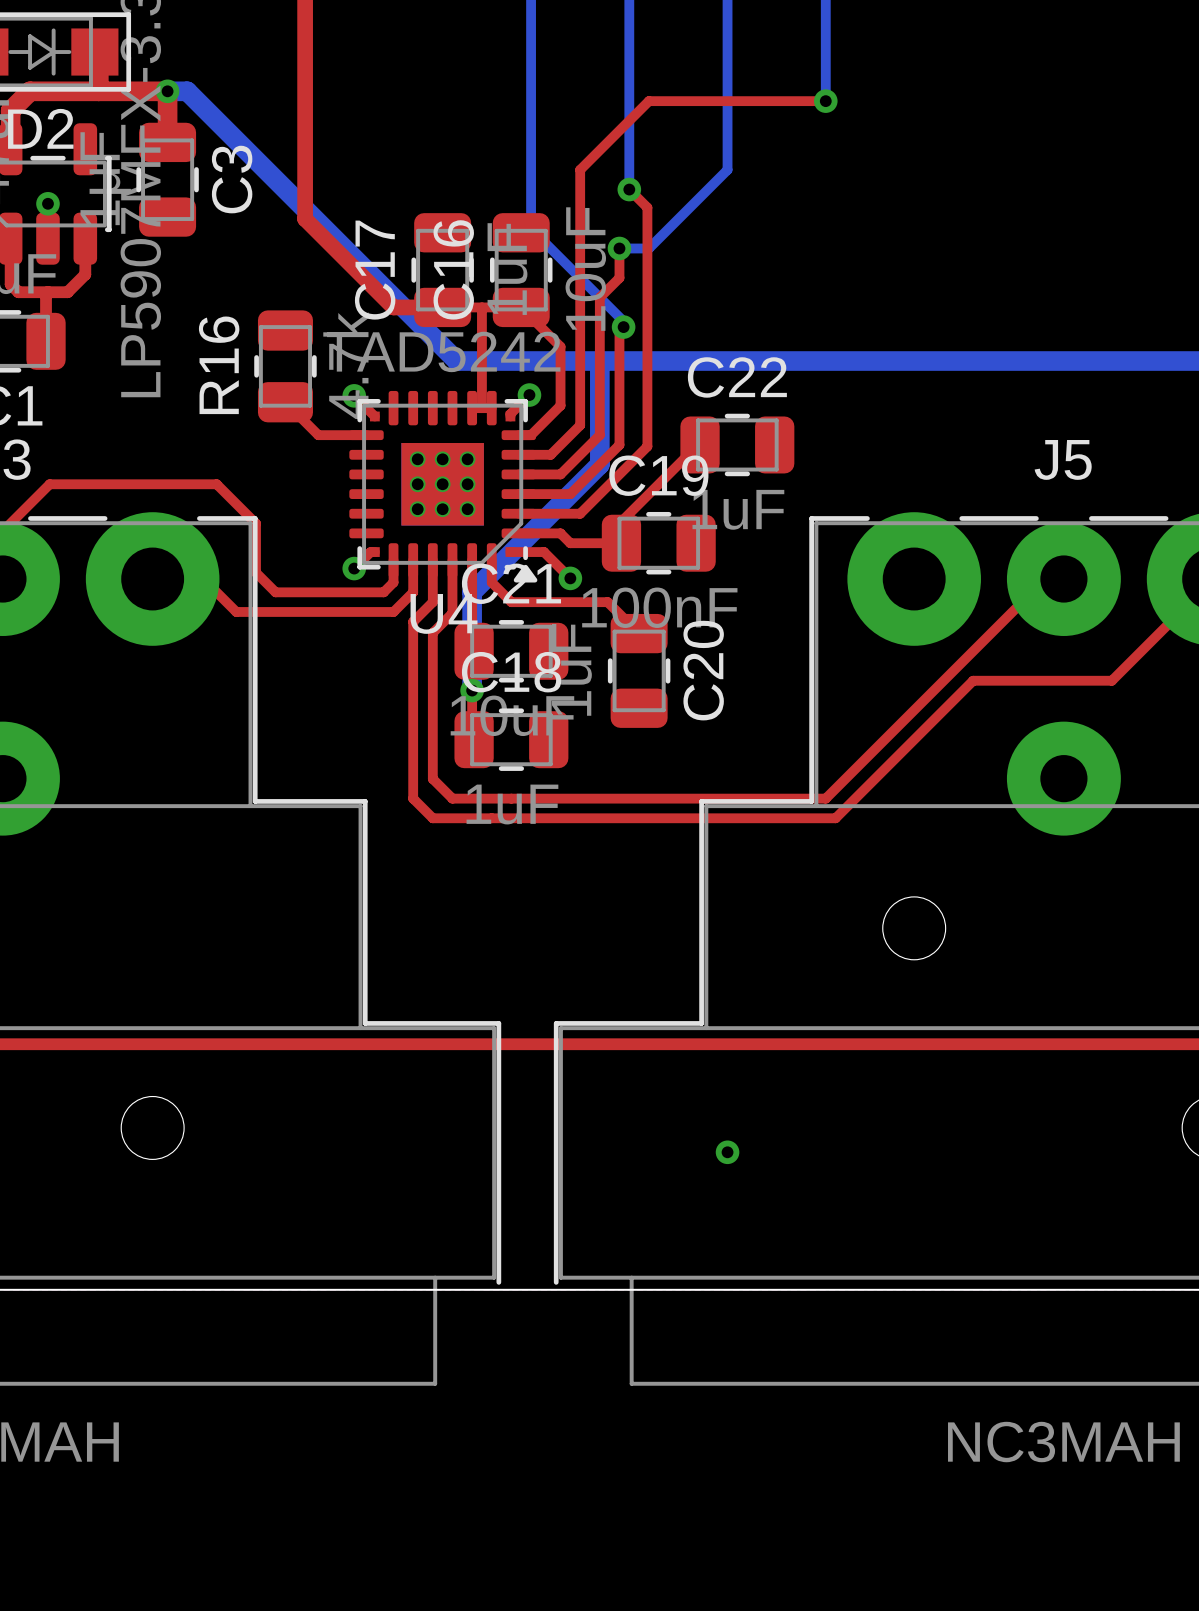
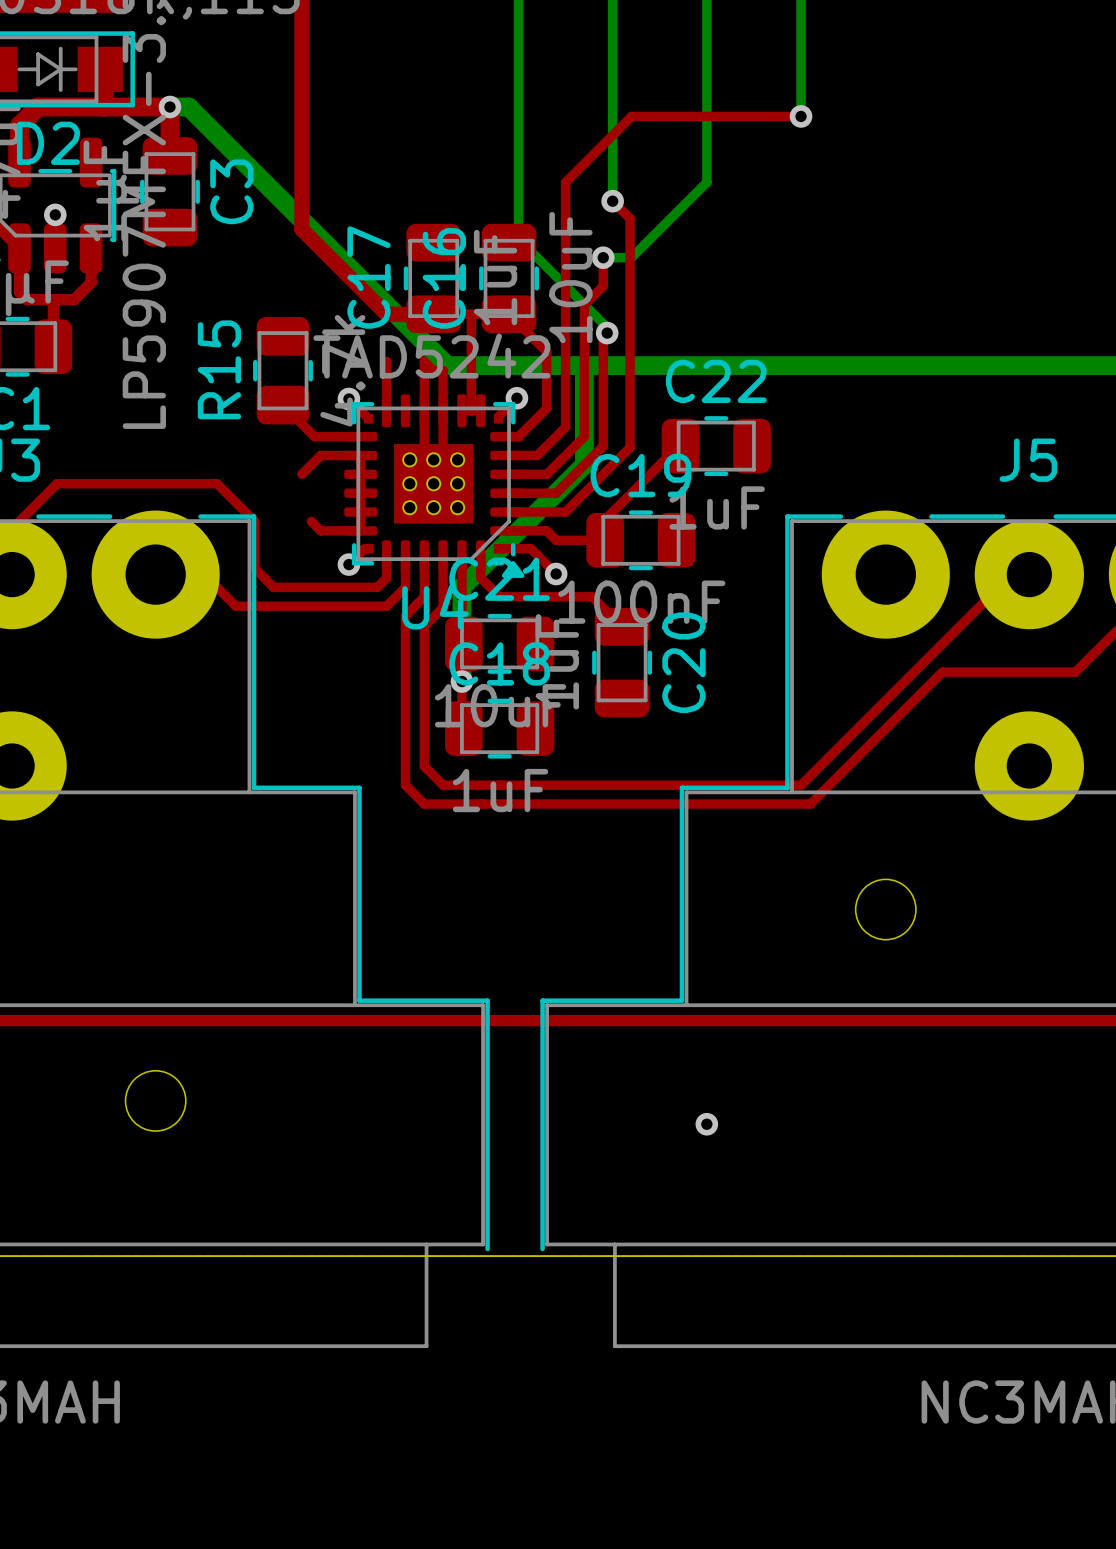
top track: none -> (386, 361) (386, 410)
R16 name: R16 (219, 365) -> R15 (219, 369)
top track: none -> (433, 459) (424, 450) (424, 361) (433, 370) (443, 370) (443, 474) (433, 483)
top track: none -> (301, 474) (320, 455) (360, 455) (360, 530) (320, 530) (311, 521)

